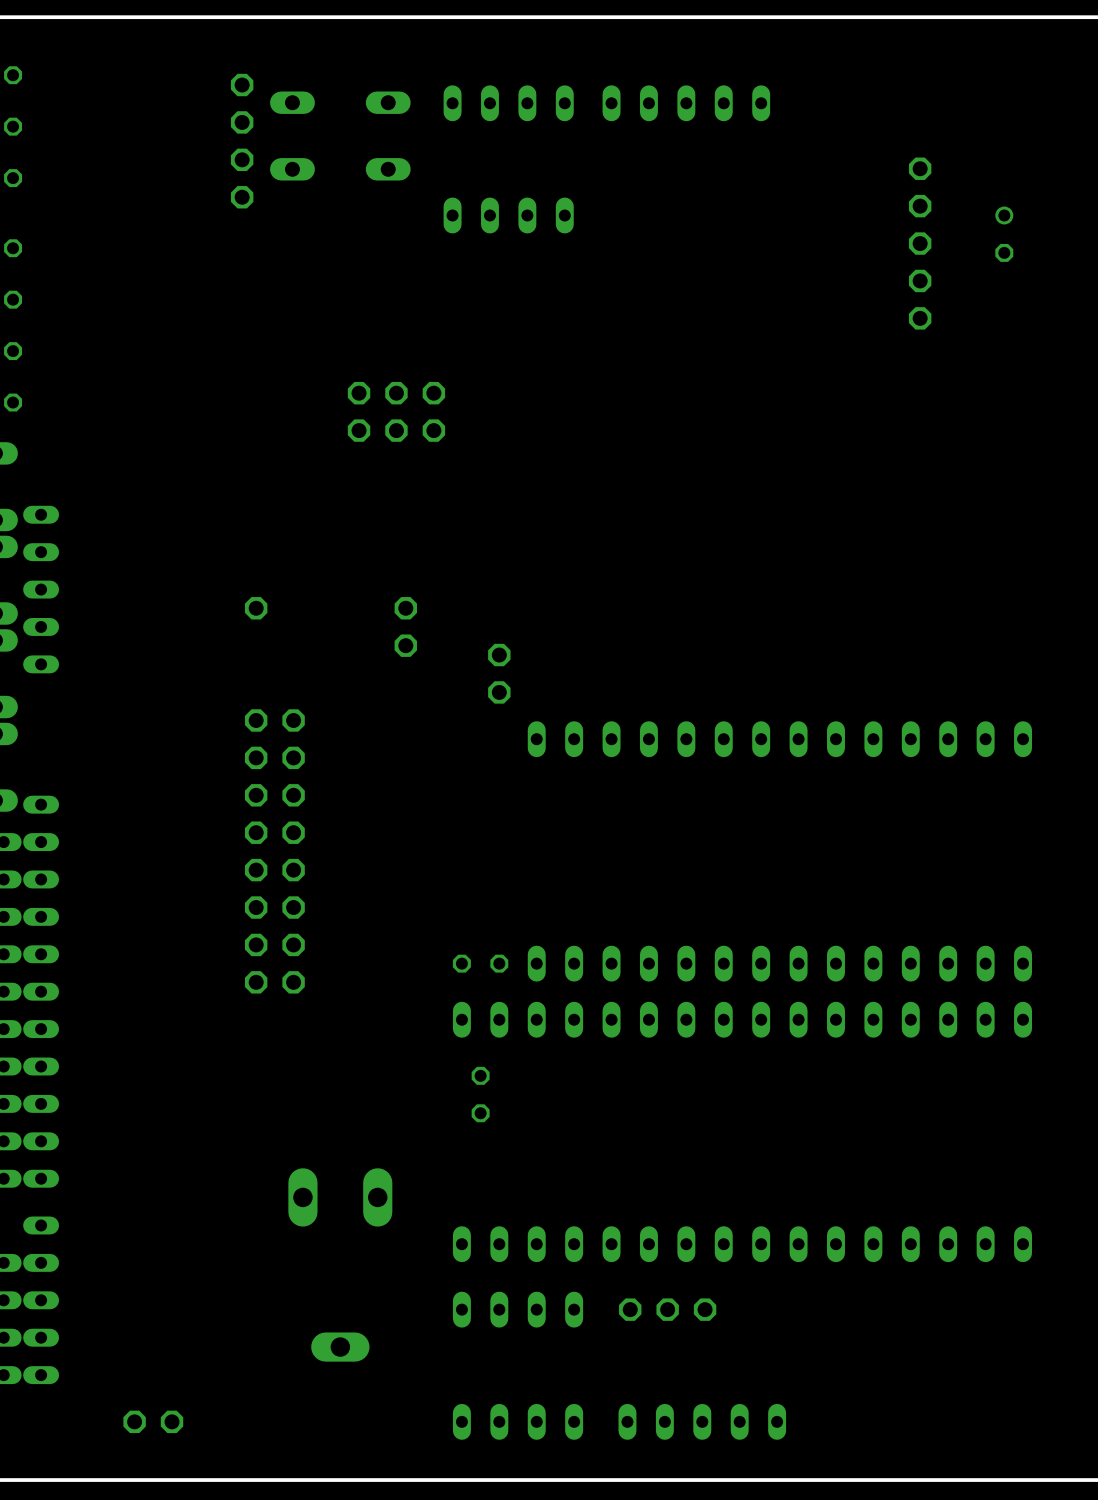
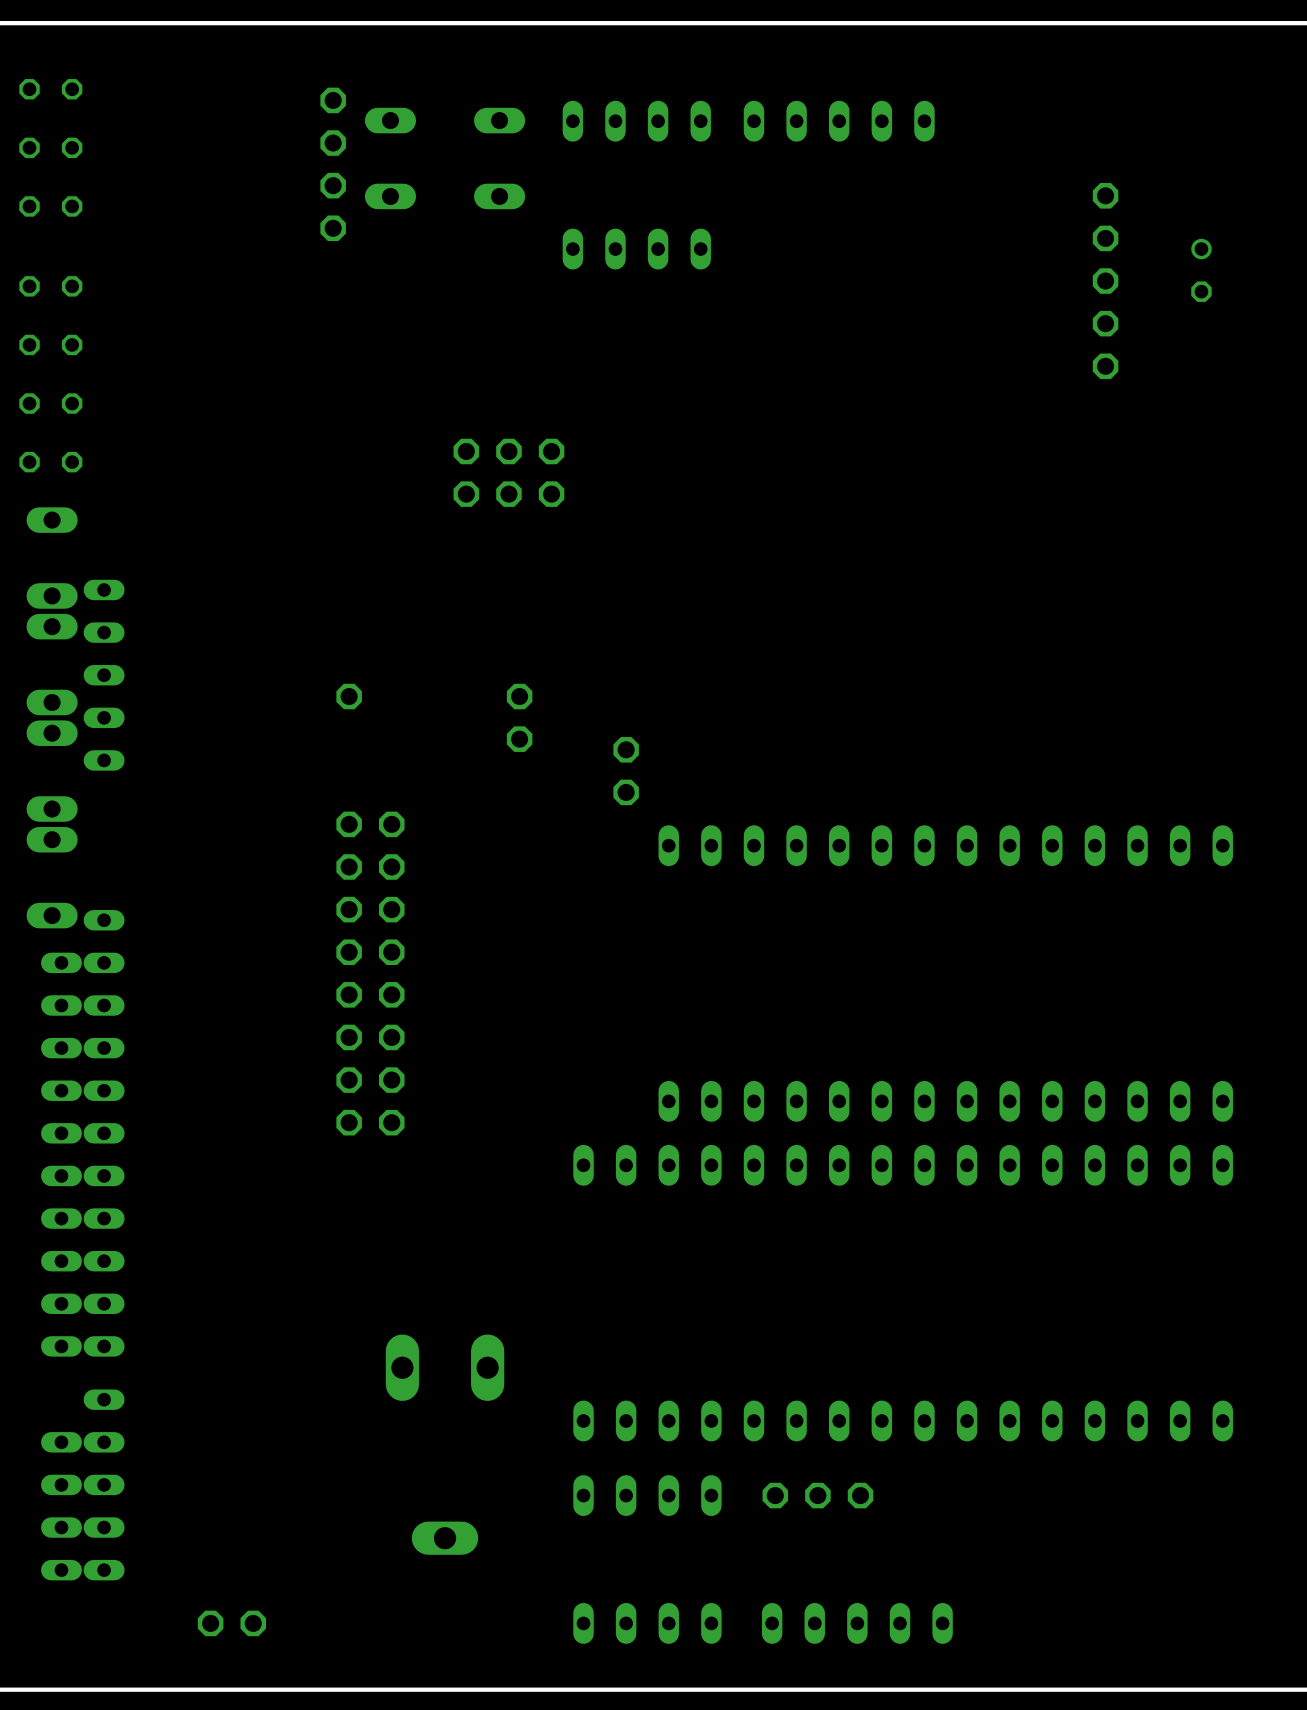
part: (480, 963) -> none
part: (480, 1094) -> none

